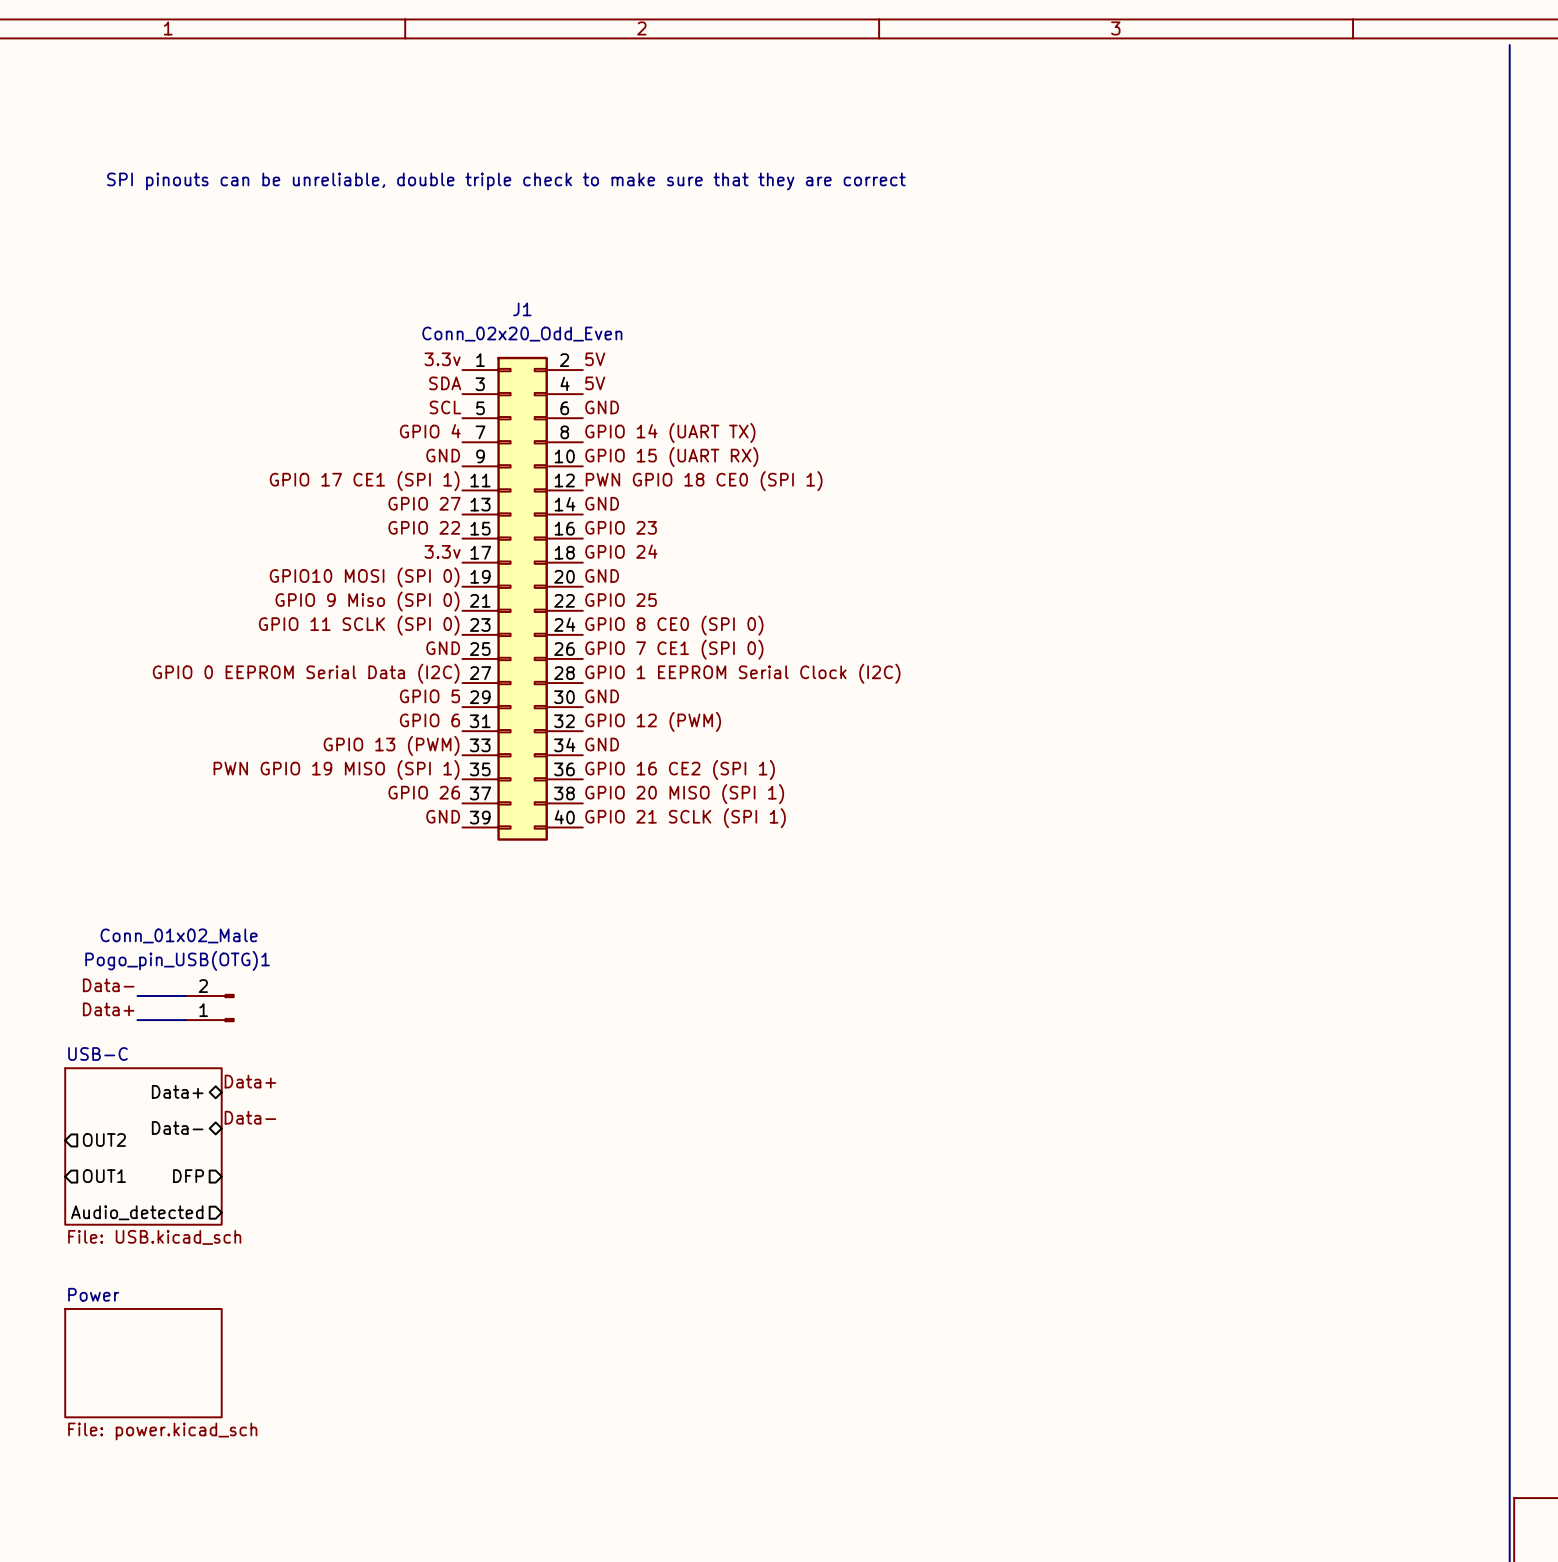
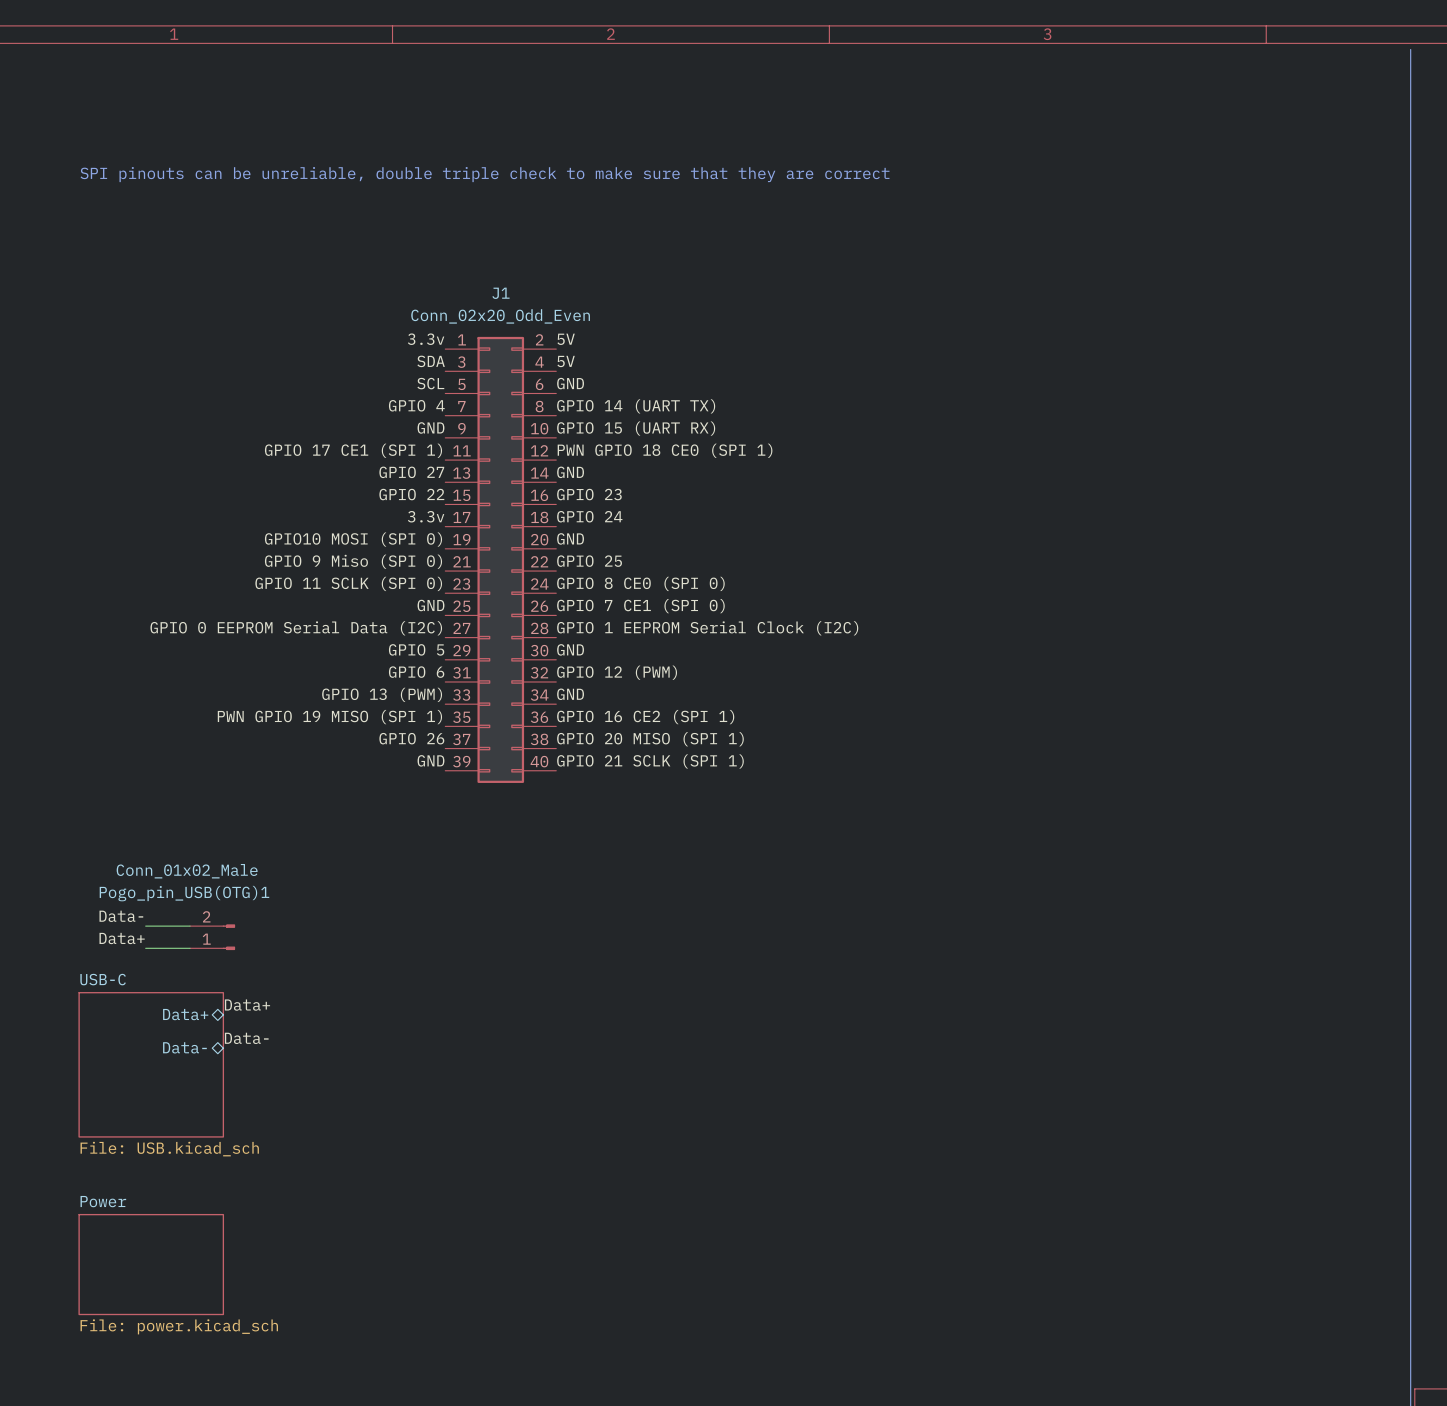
sheet pin: OUT2 (104, 1140) -> none
sheet pin: OUT1 (104, 1176) -> none
sheet pin: DFP (188, 1176) -> none
sheet pin: Audio_detected (137, 1212) -> none

